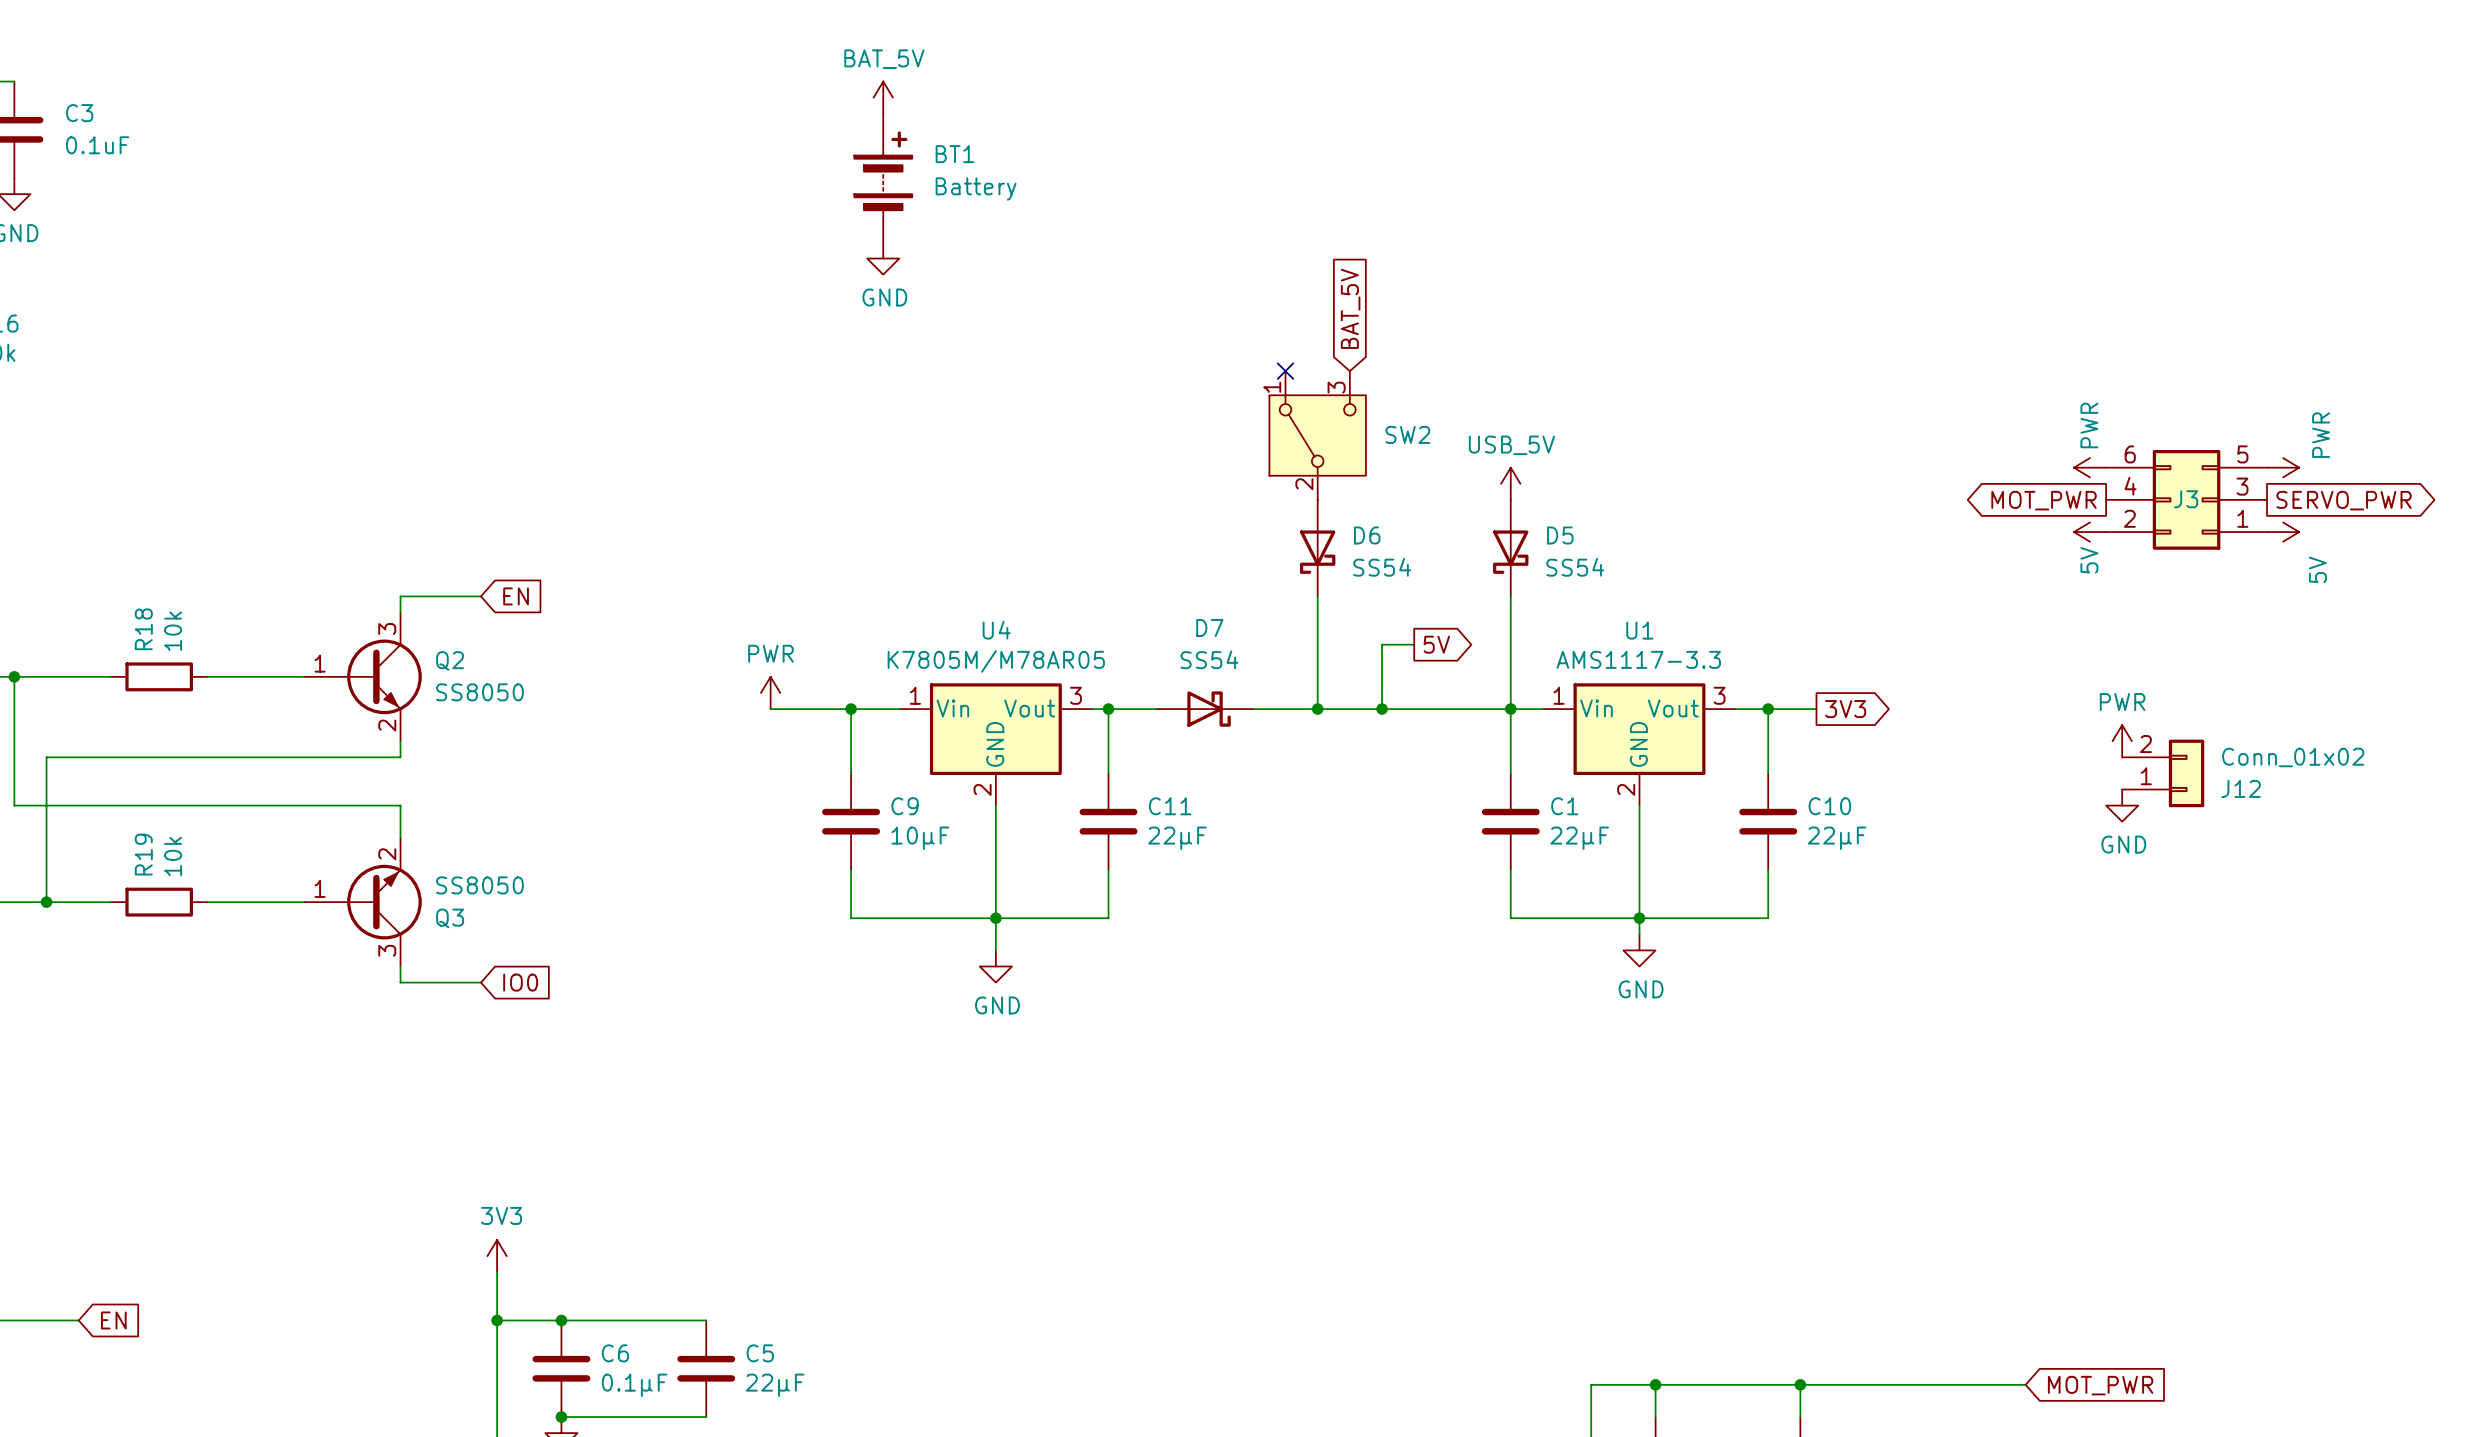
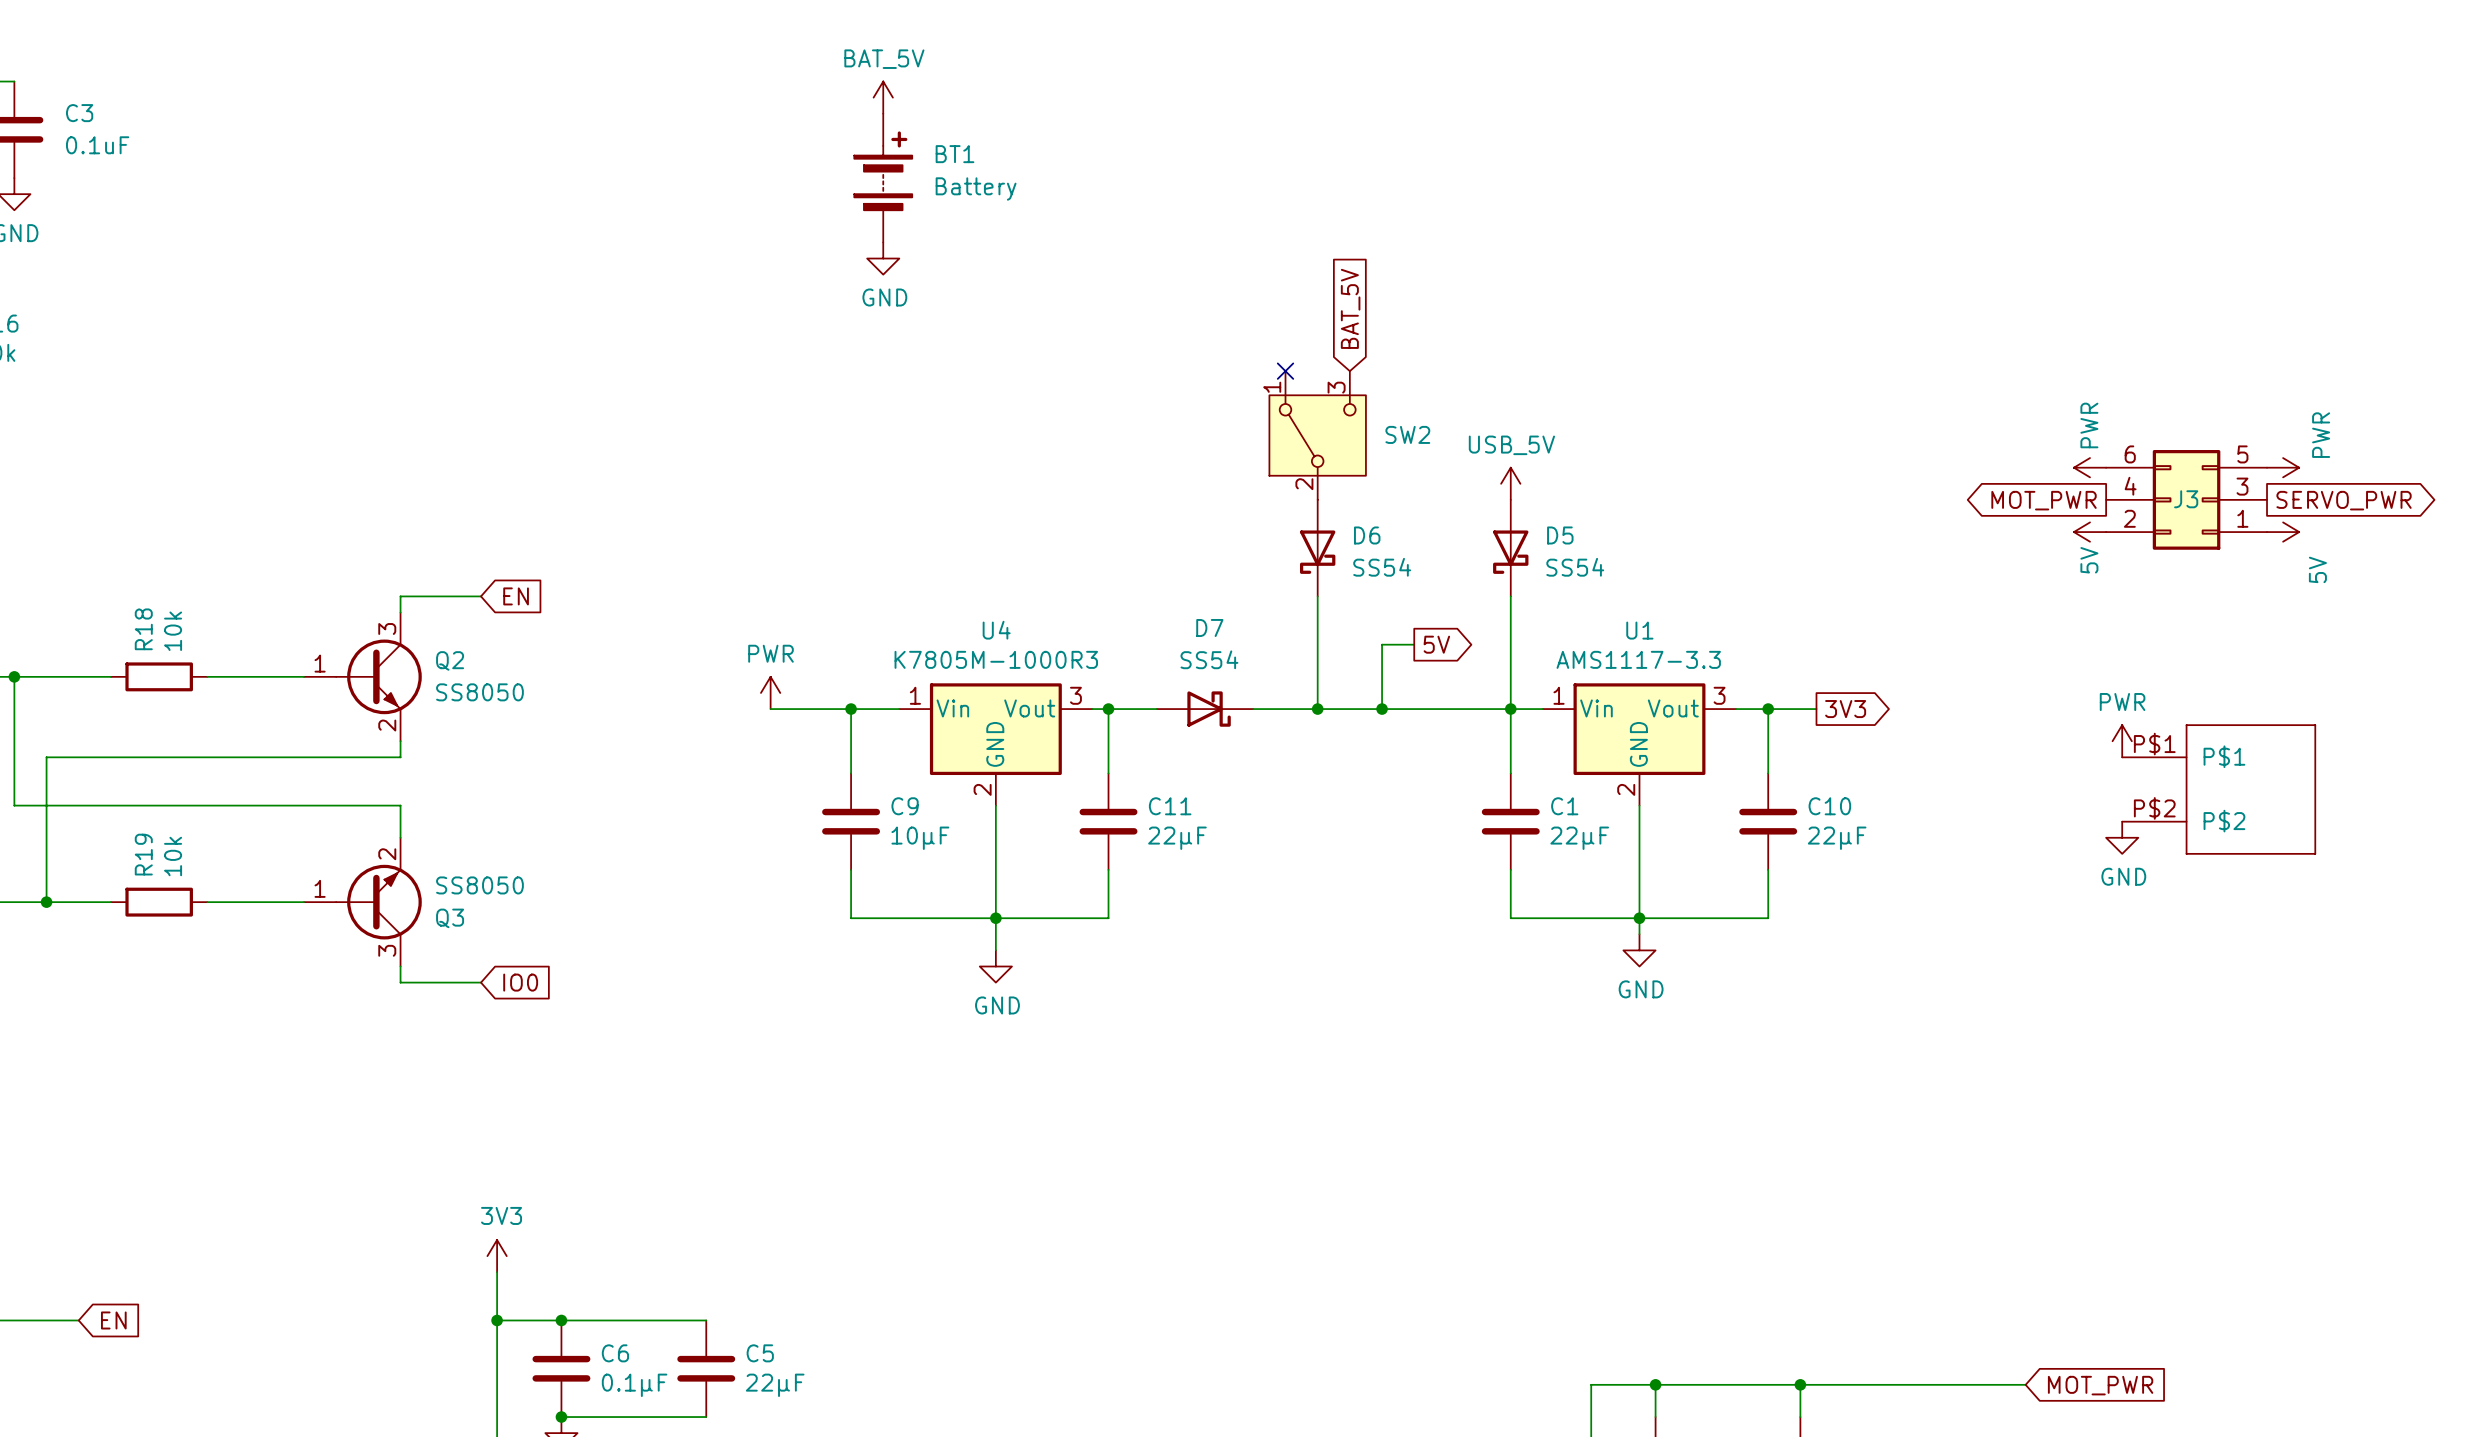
U4 value: K7805M/M78AR05 (996, 661) -> K7805M-1000R3 (996, 659)
J12: Conn_01x02 (2163, 773) -> none
part: none -> (2218, 789)
power symbol position: GND (2122, 805) -> GND (2122, 837)

